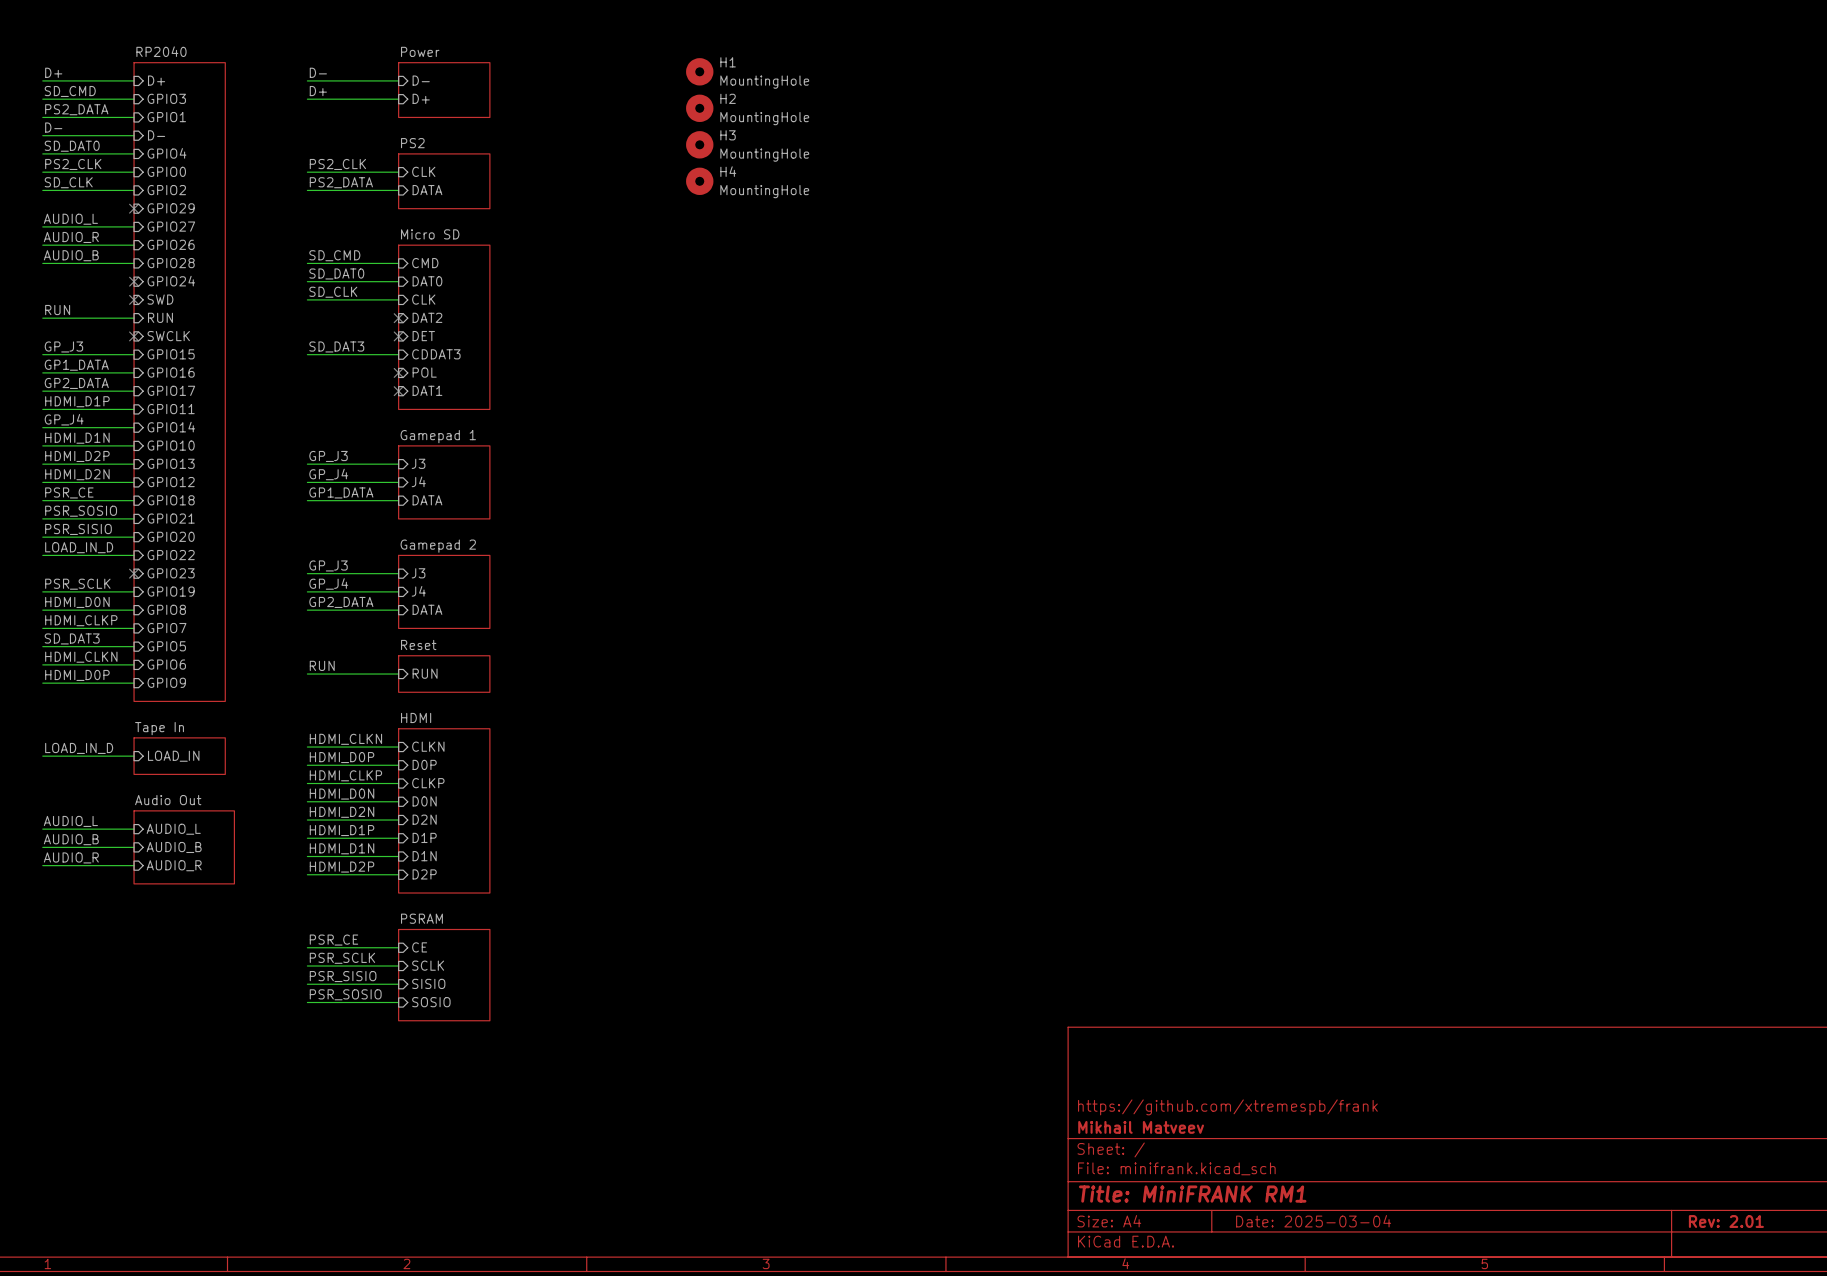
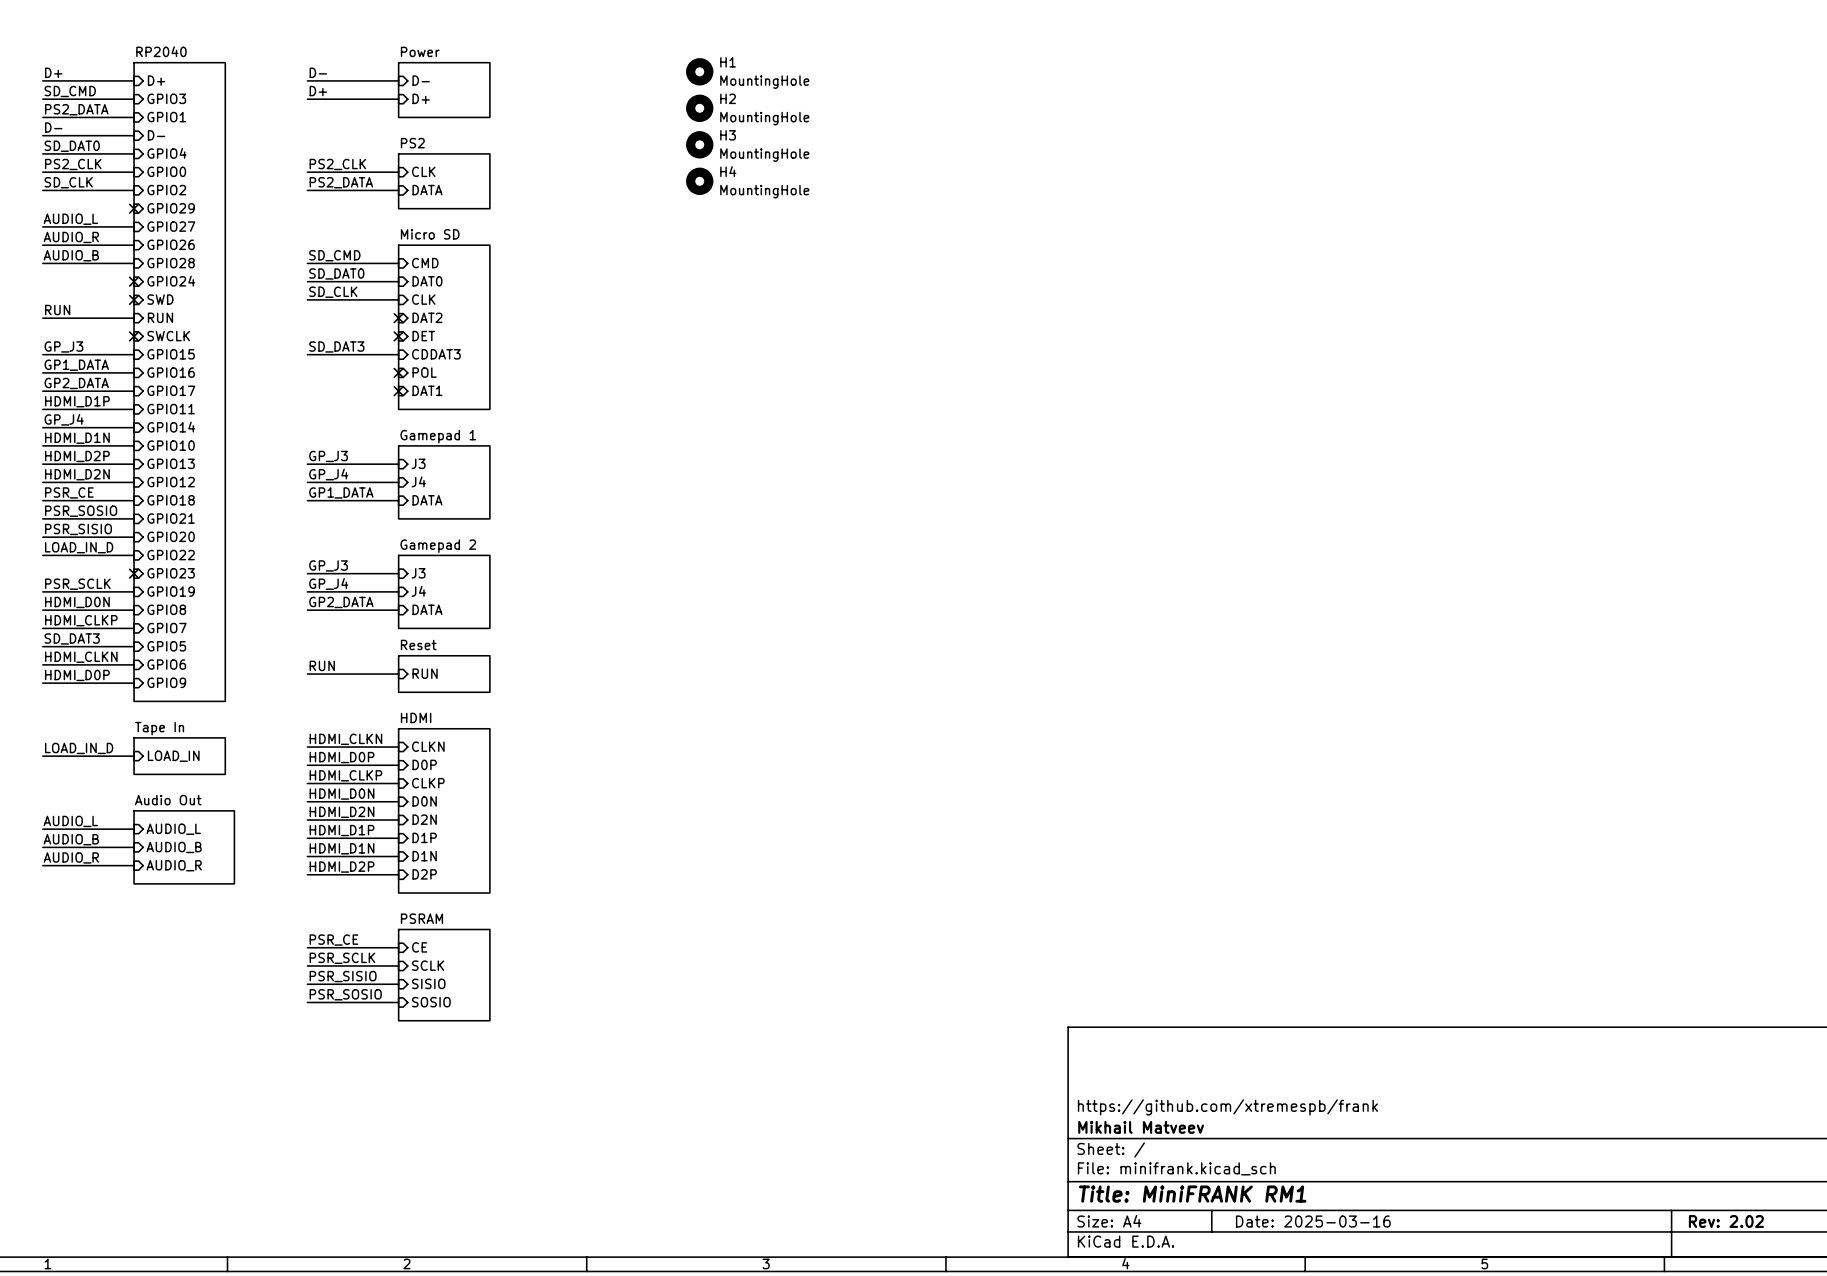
title block: Date: 2025-03-04 (1313, 1221) -> Date: 2025-03-16 (1313, 1221)
title block: Rev: 2.01 (1726, 1221) -> Rev: 2.02 (1726, 1221)

